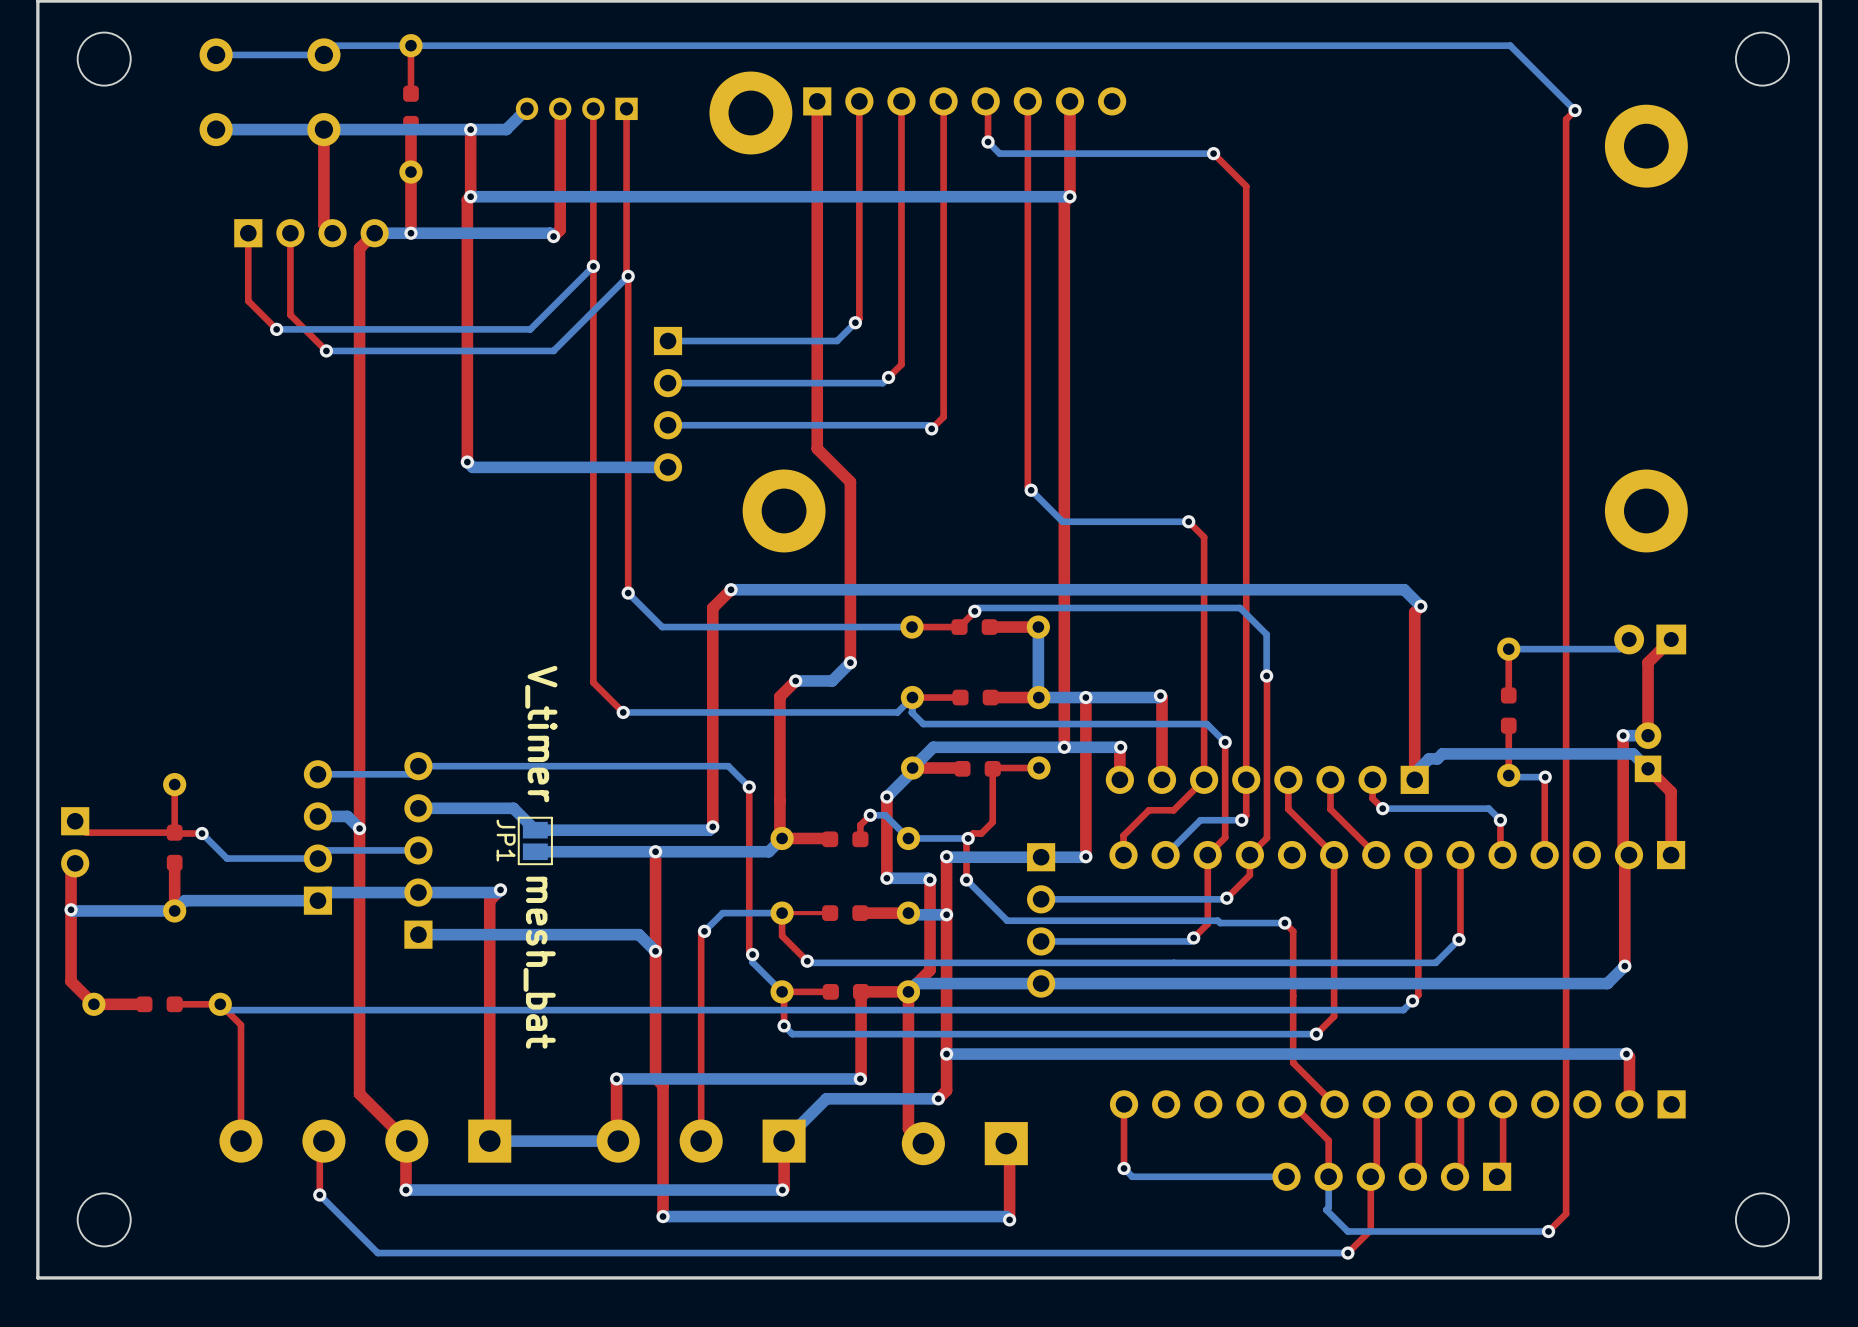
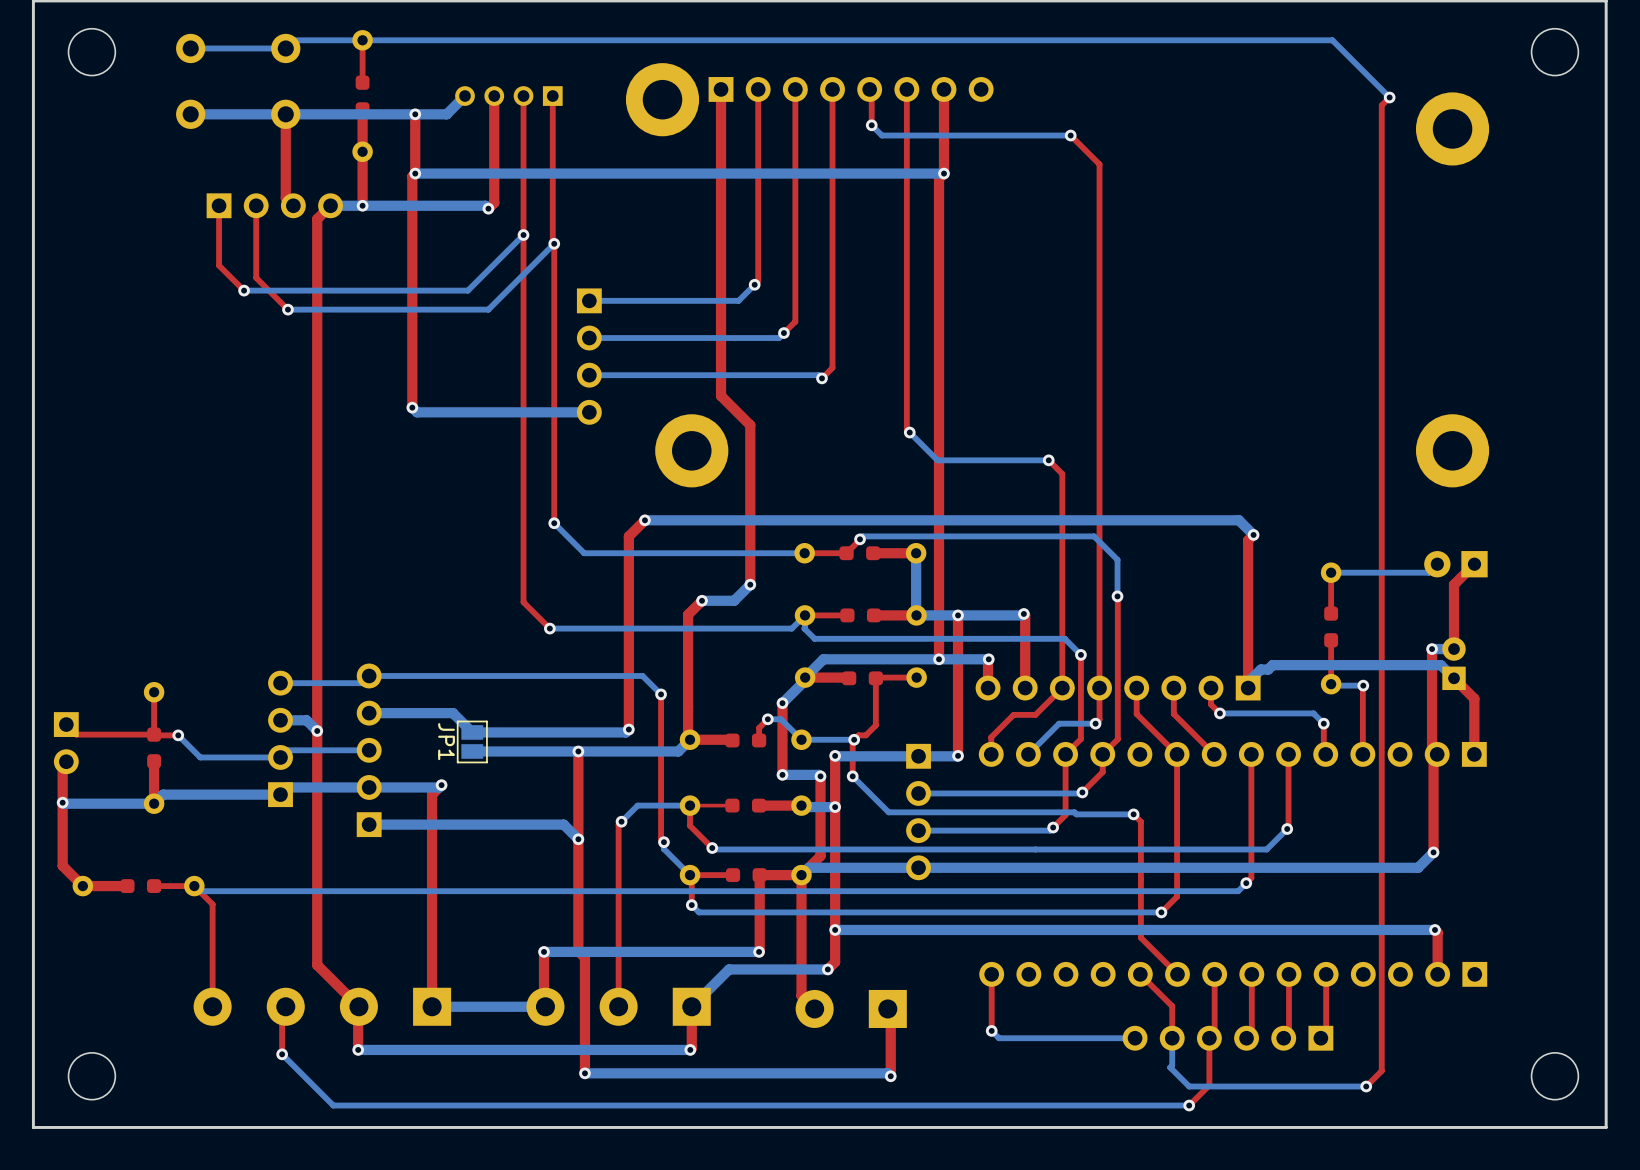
text: V_timer (541, 734) -> none
text: mesh_bat (539, 962) -> none

